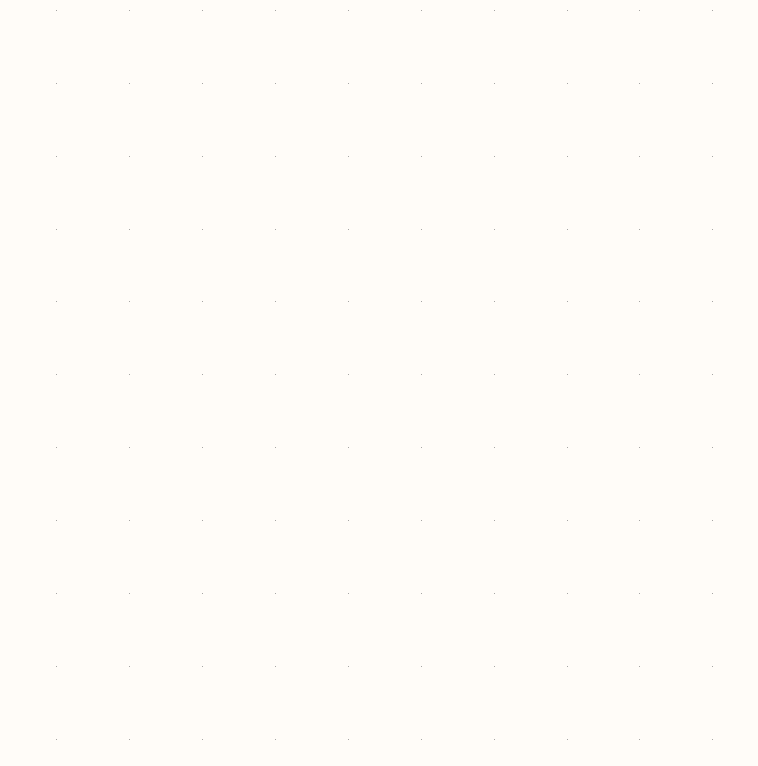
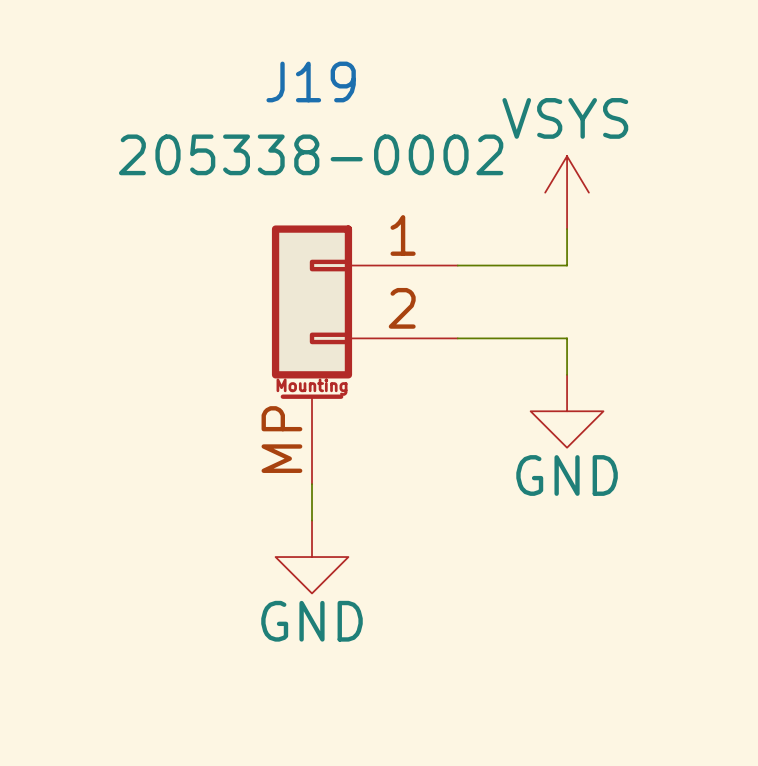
power symbol: none -> VSYS (567, 192)
wire: none -> (567, 229) (567, 265) (457, 265)
wire: none -> (457, 338) (567, 338) (567, 374)
J19: none -> 205338-0002 (364, 354)
power symbol: none -> GND (567, 411)
wire: none -> (312, 484) (312, 520)
power symbol: none -> GND (312, 557)

